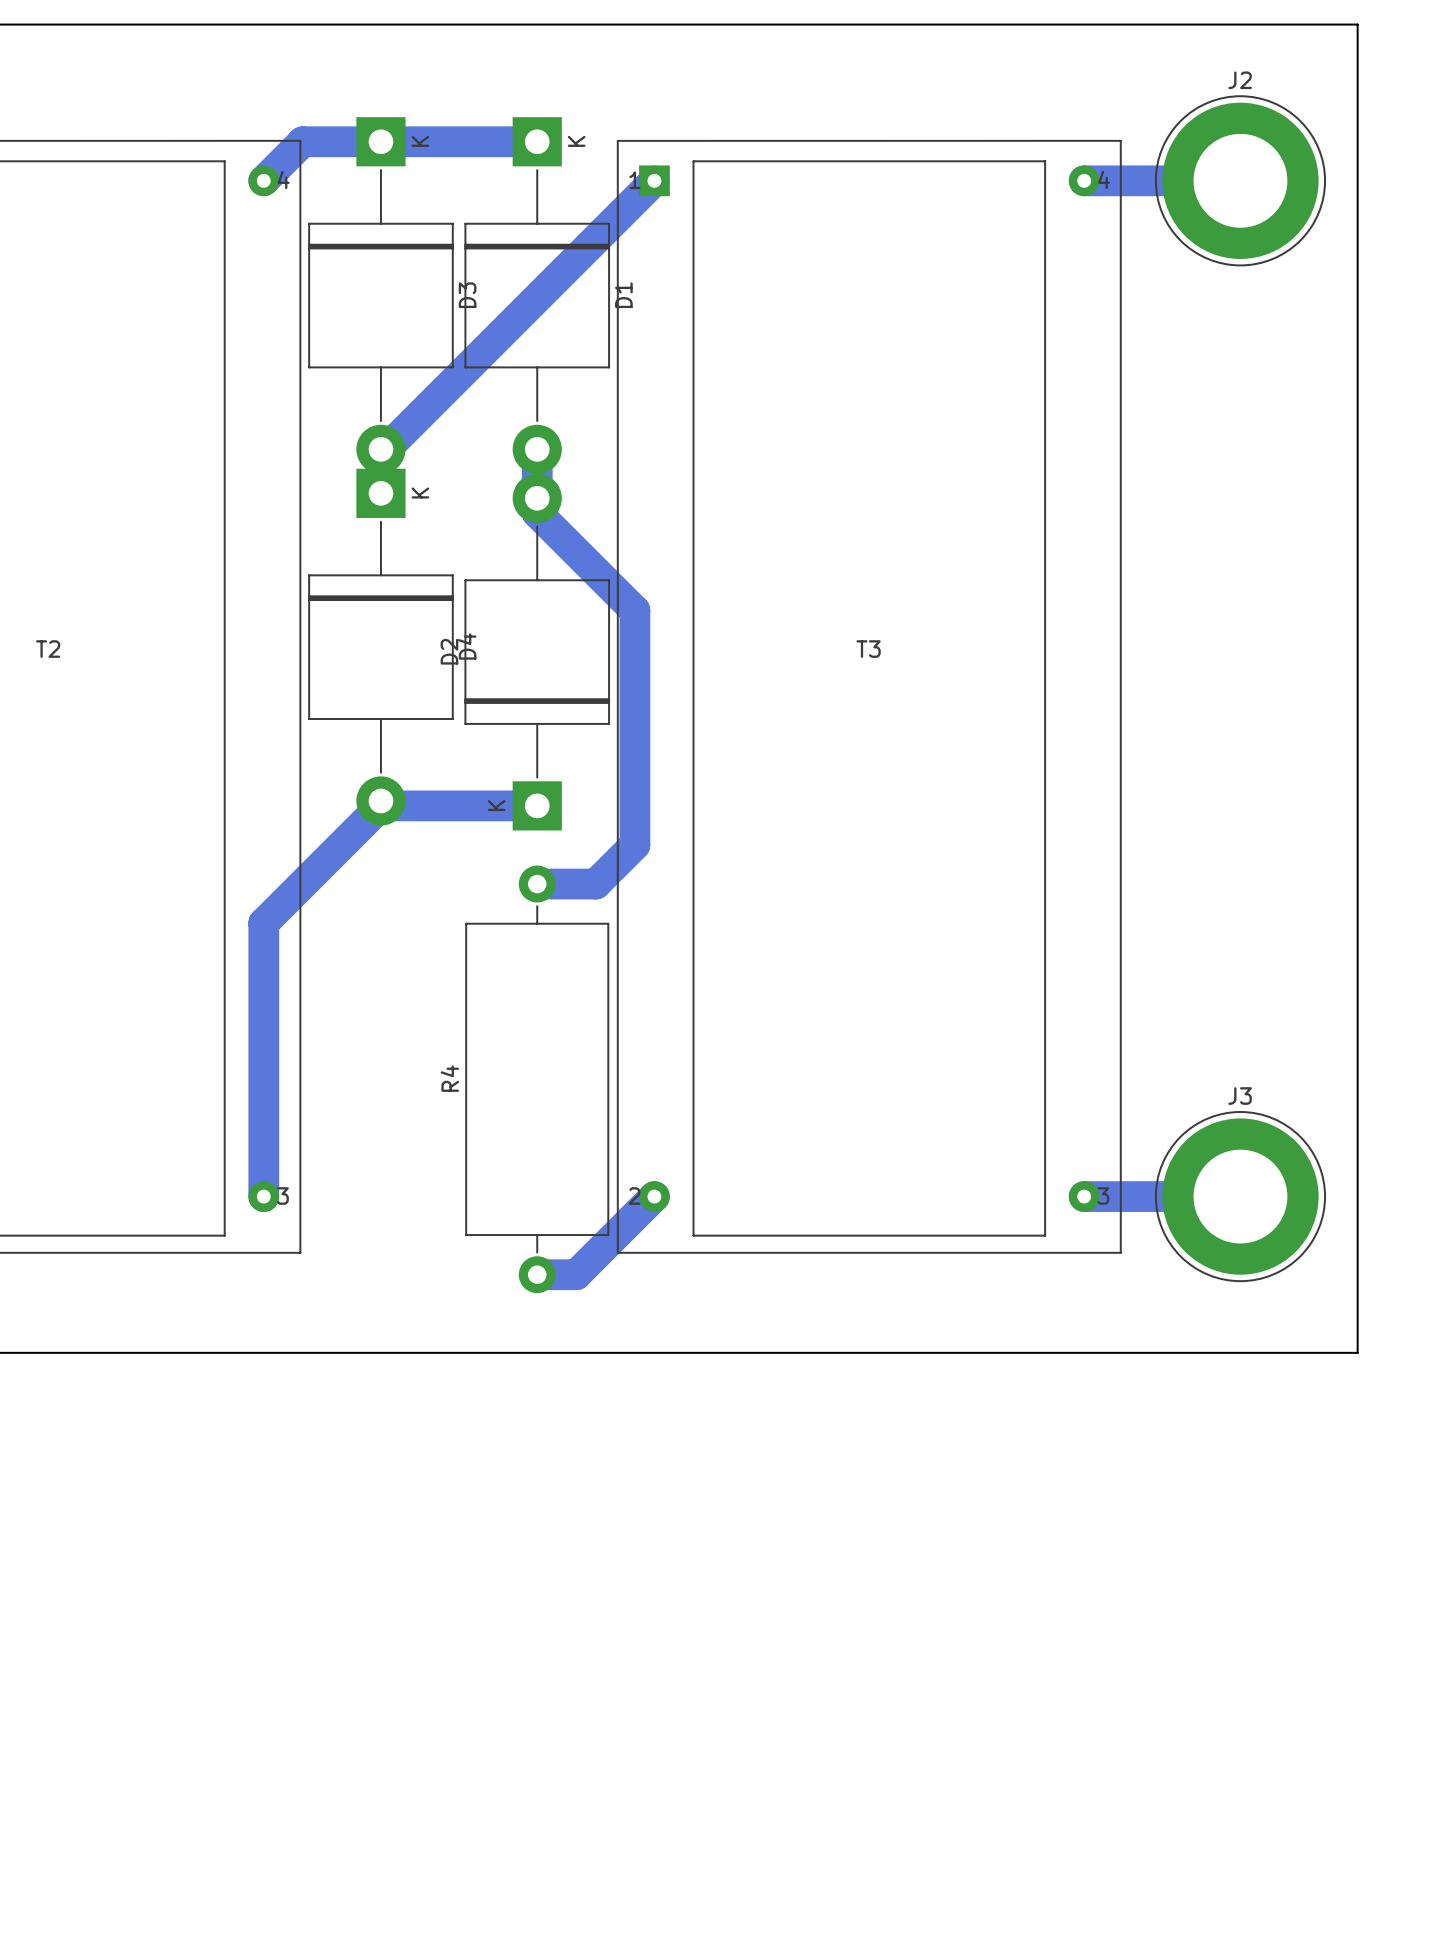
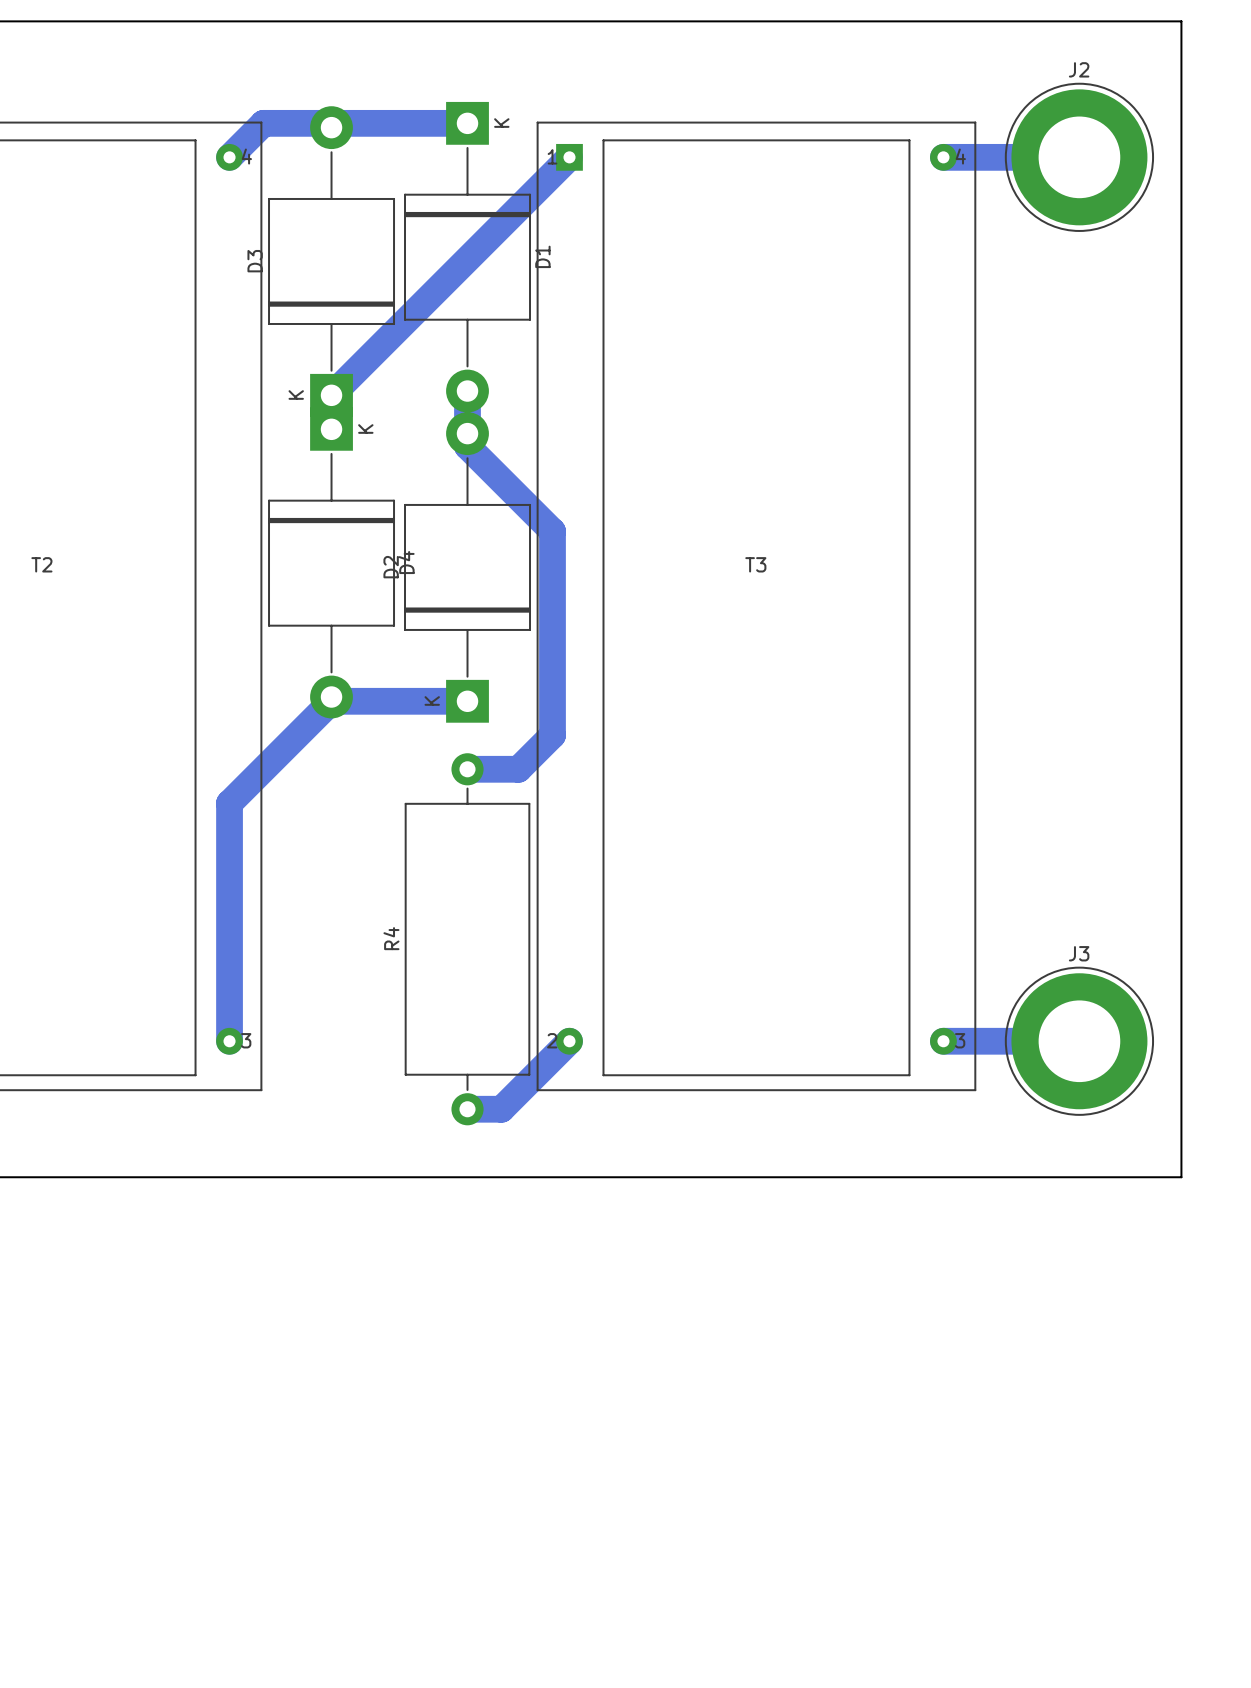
D3 rotation: 0° (380, 295) -> 180° (331, 261)

